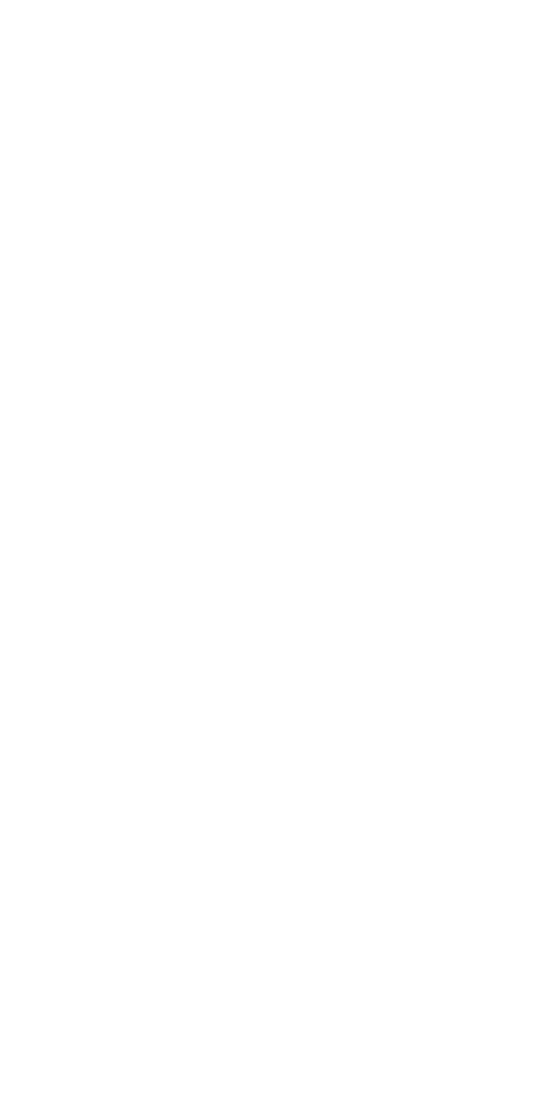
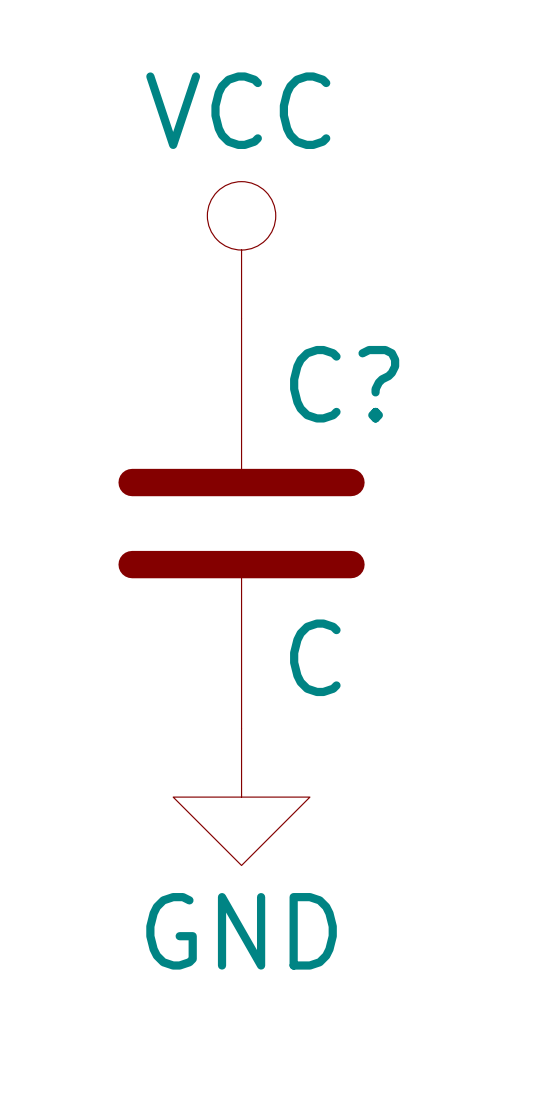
power symbol: none -> VCC (241, 250)
C?: none -> C (241, 523)
power symbol: none -> GND (241, 797)

